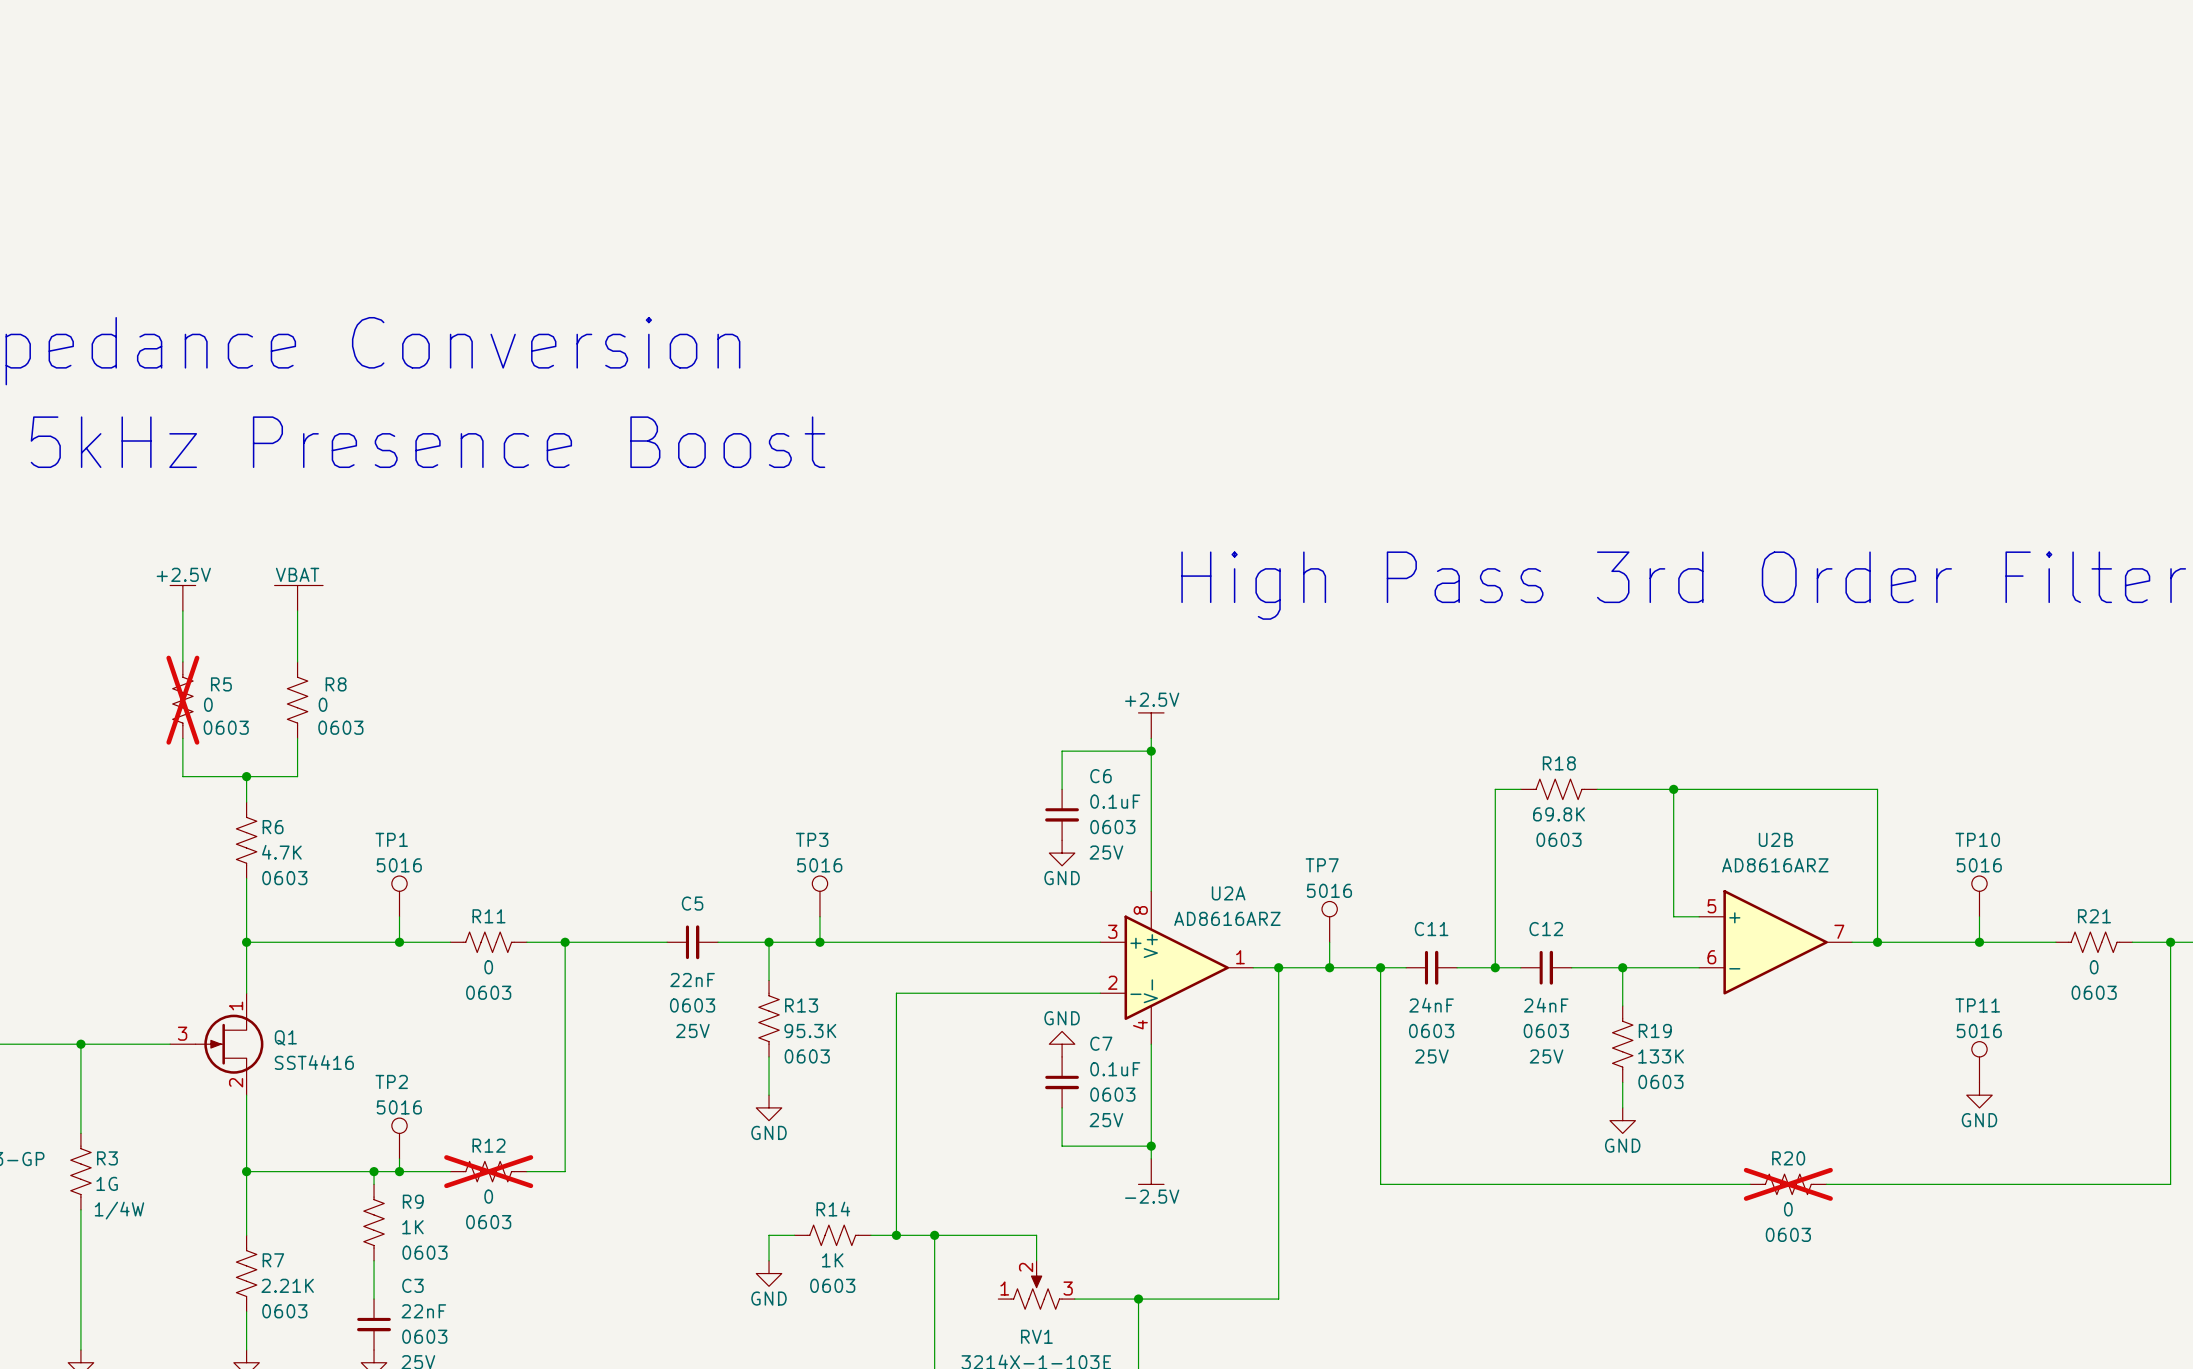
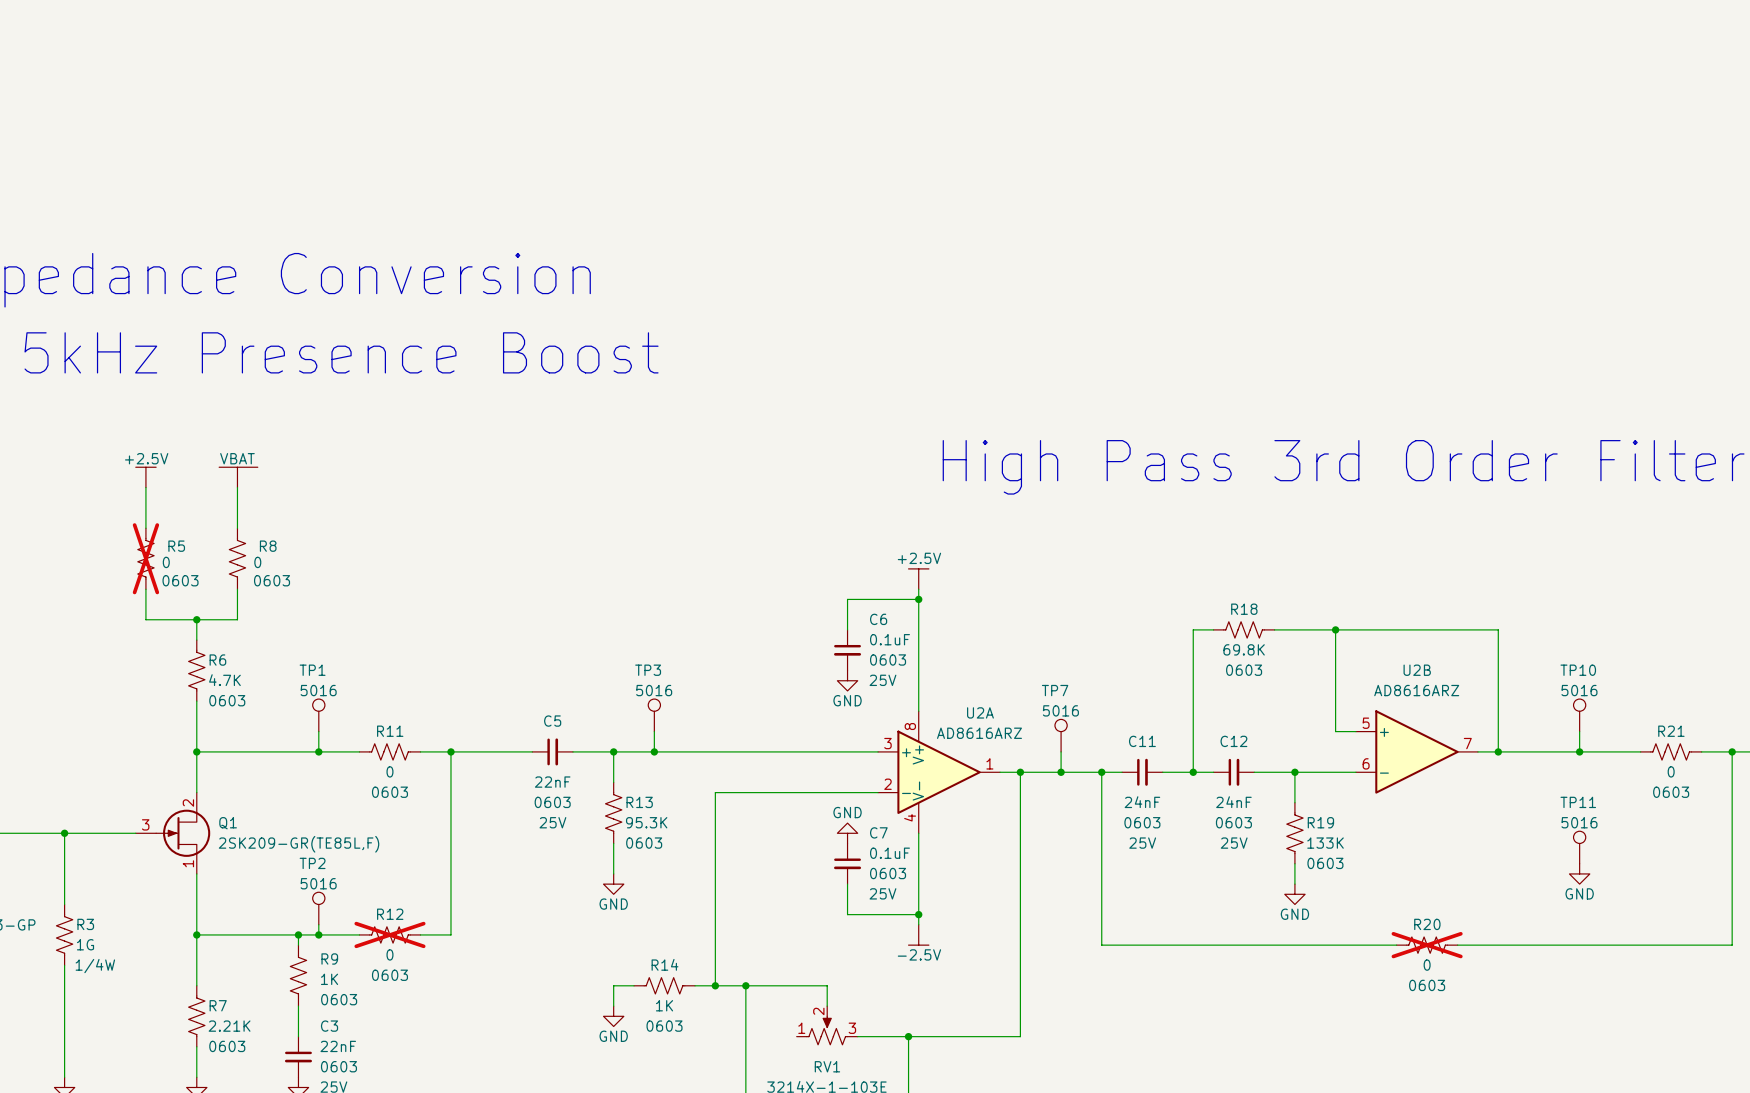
Q1 flip: as is (229, 1044) -> up-down (183, 833)
Q1 value: SST4416 (314, 1062) -> 2SK209-GR(TE85L,F) (299, 844)

